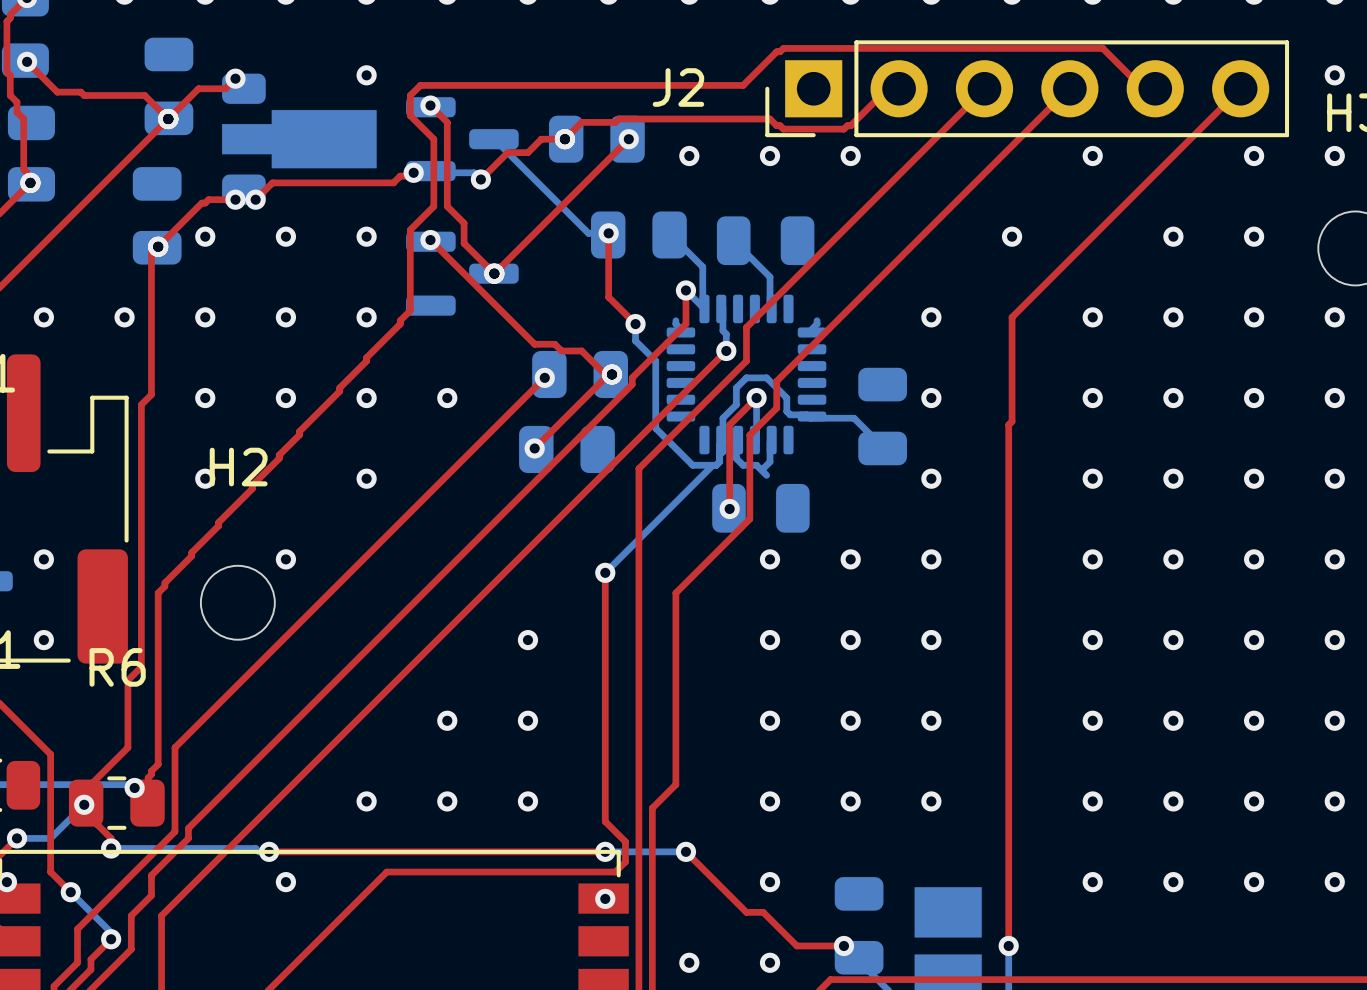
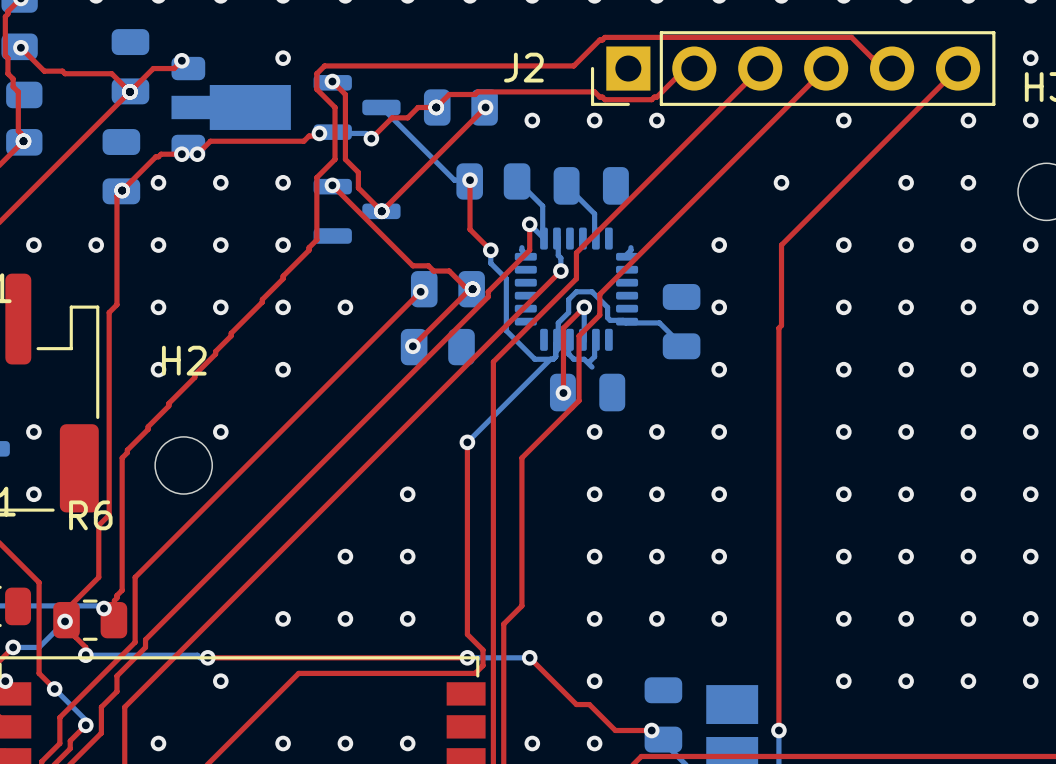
via: (605, 898) -> none
via: none -> (158, 743)
via: none -> (283, 743)
via: none -> (345, 743)
via: none -> (407, 743)

